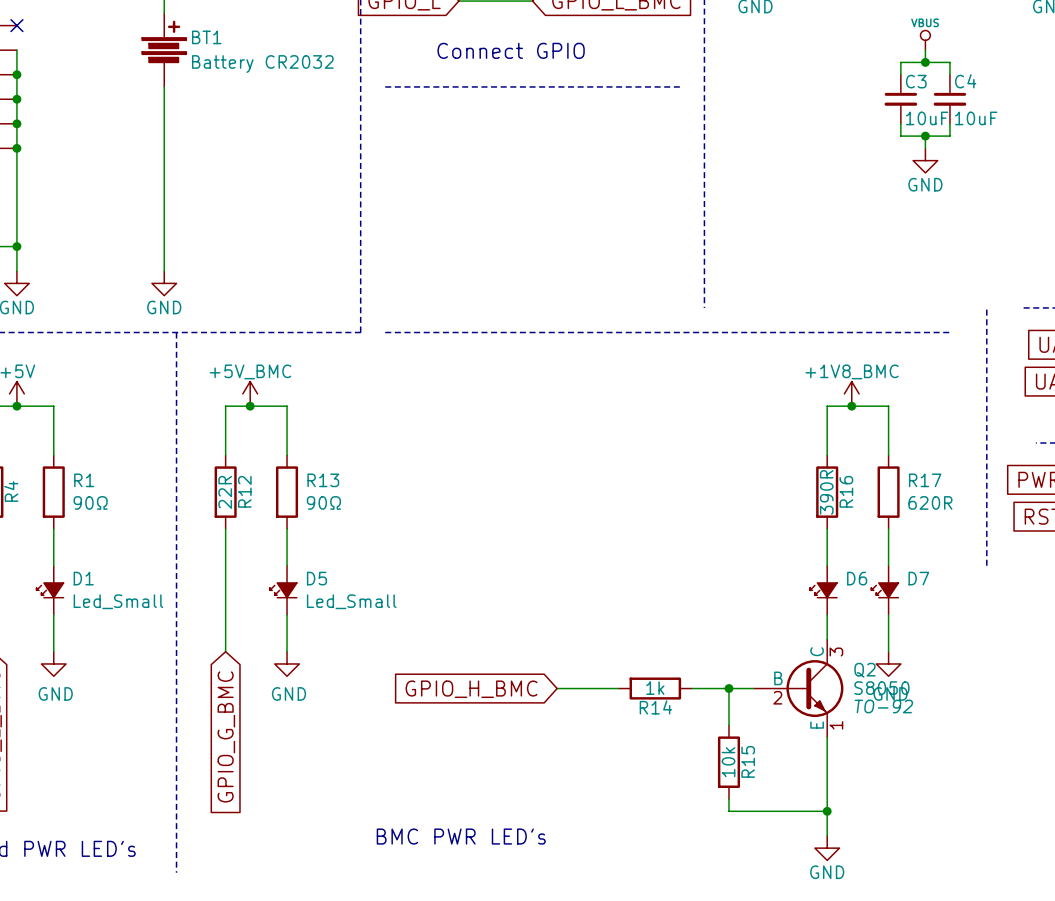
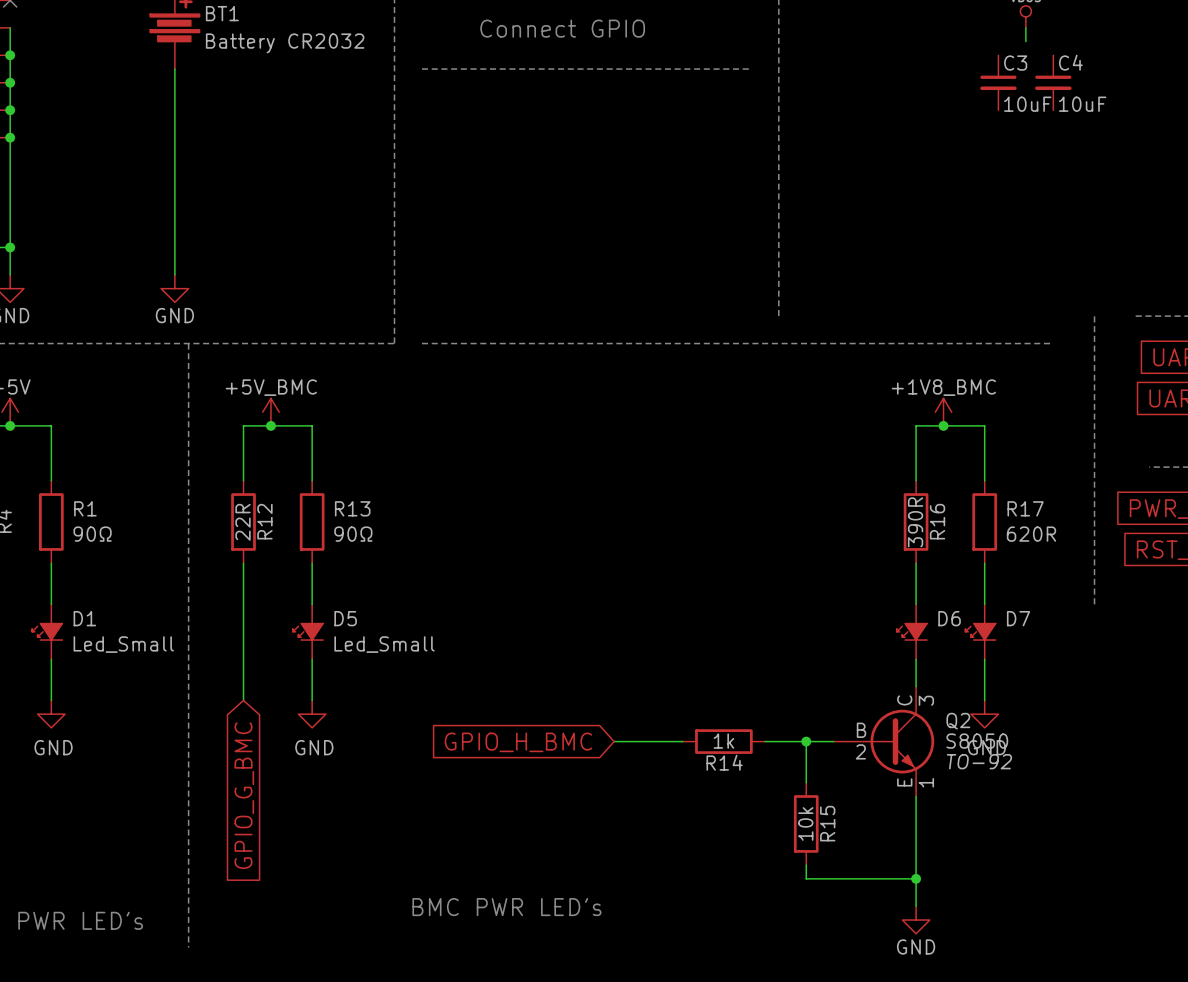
junction: (925, 62) -> none
wire: (900, 74) (900, 62) (949, 62) (949, 74) -> none
wire: (900, 123) (900, 136) (949, 136) (949, 123) -> none
wire: (925, 136) (925, 148) -> none
junction: (925, 136) -> none
power symbol: GND (925, 160) -> none

